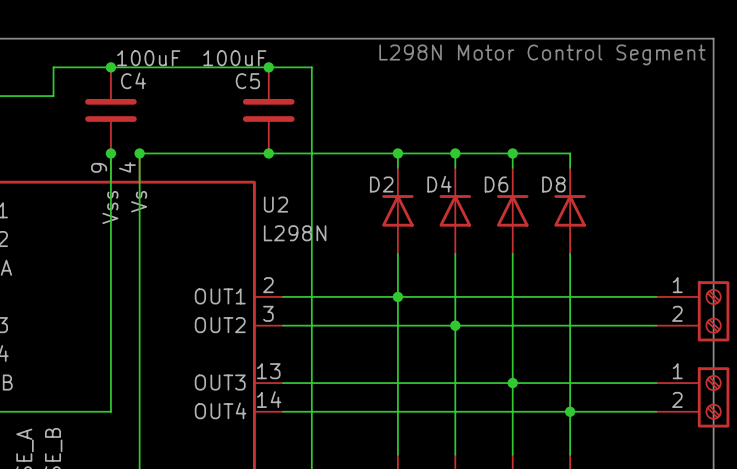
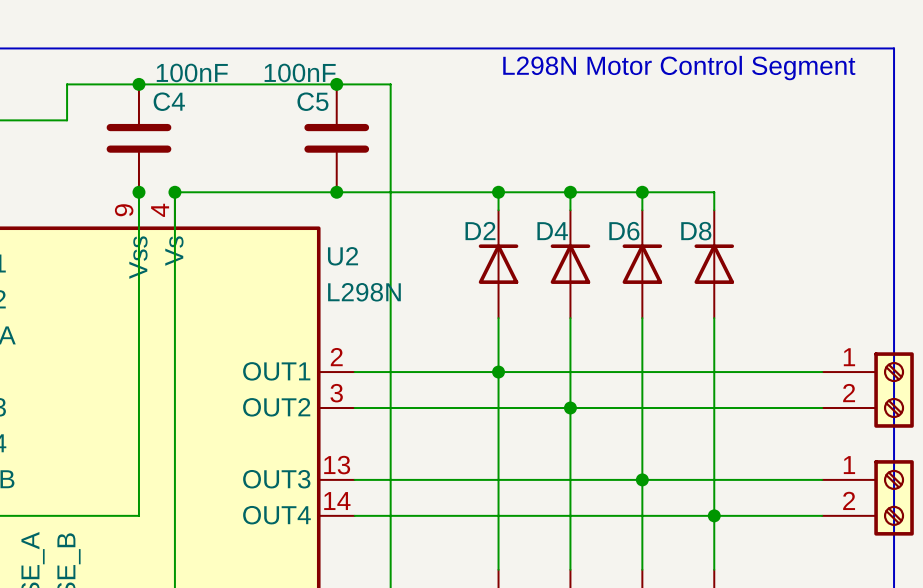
C4 value: 100uF (148, 58) -> 100nF (192, 72)
C5 value: 100uF (234, 58) -> 100nF (300, 72)

